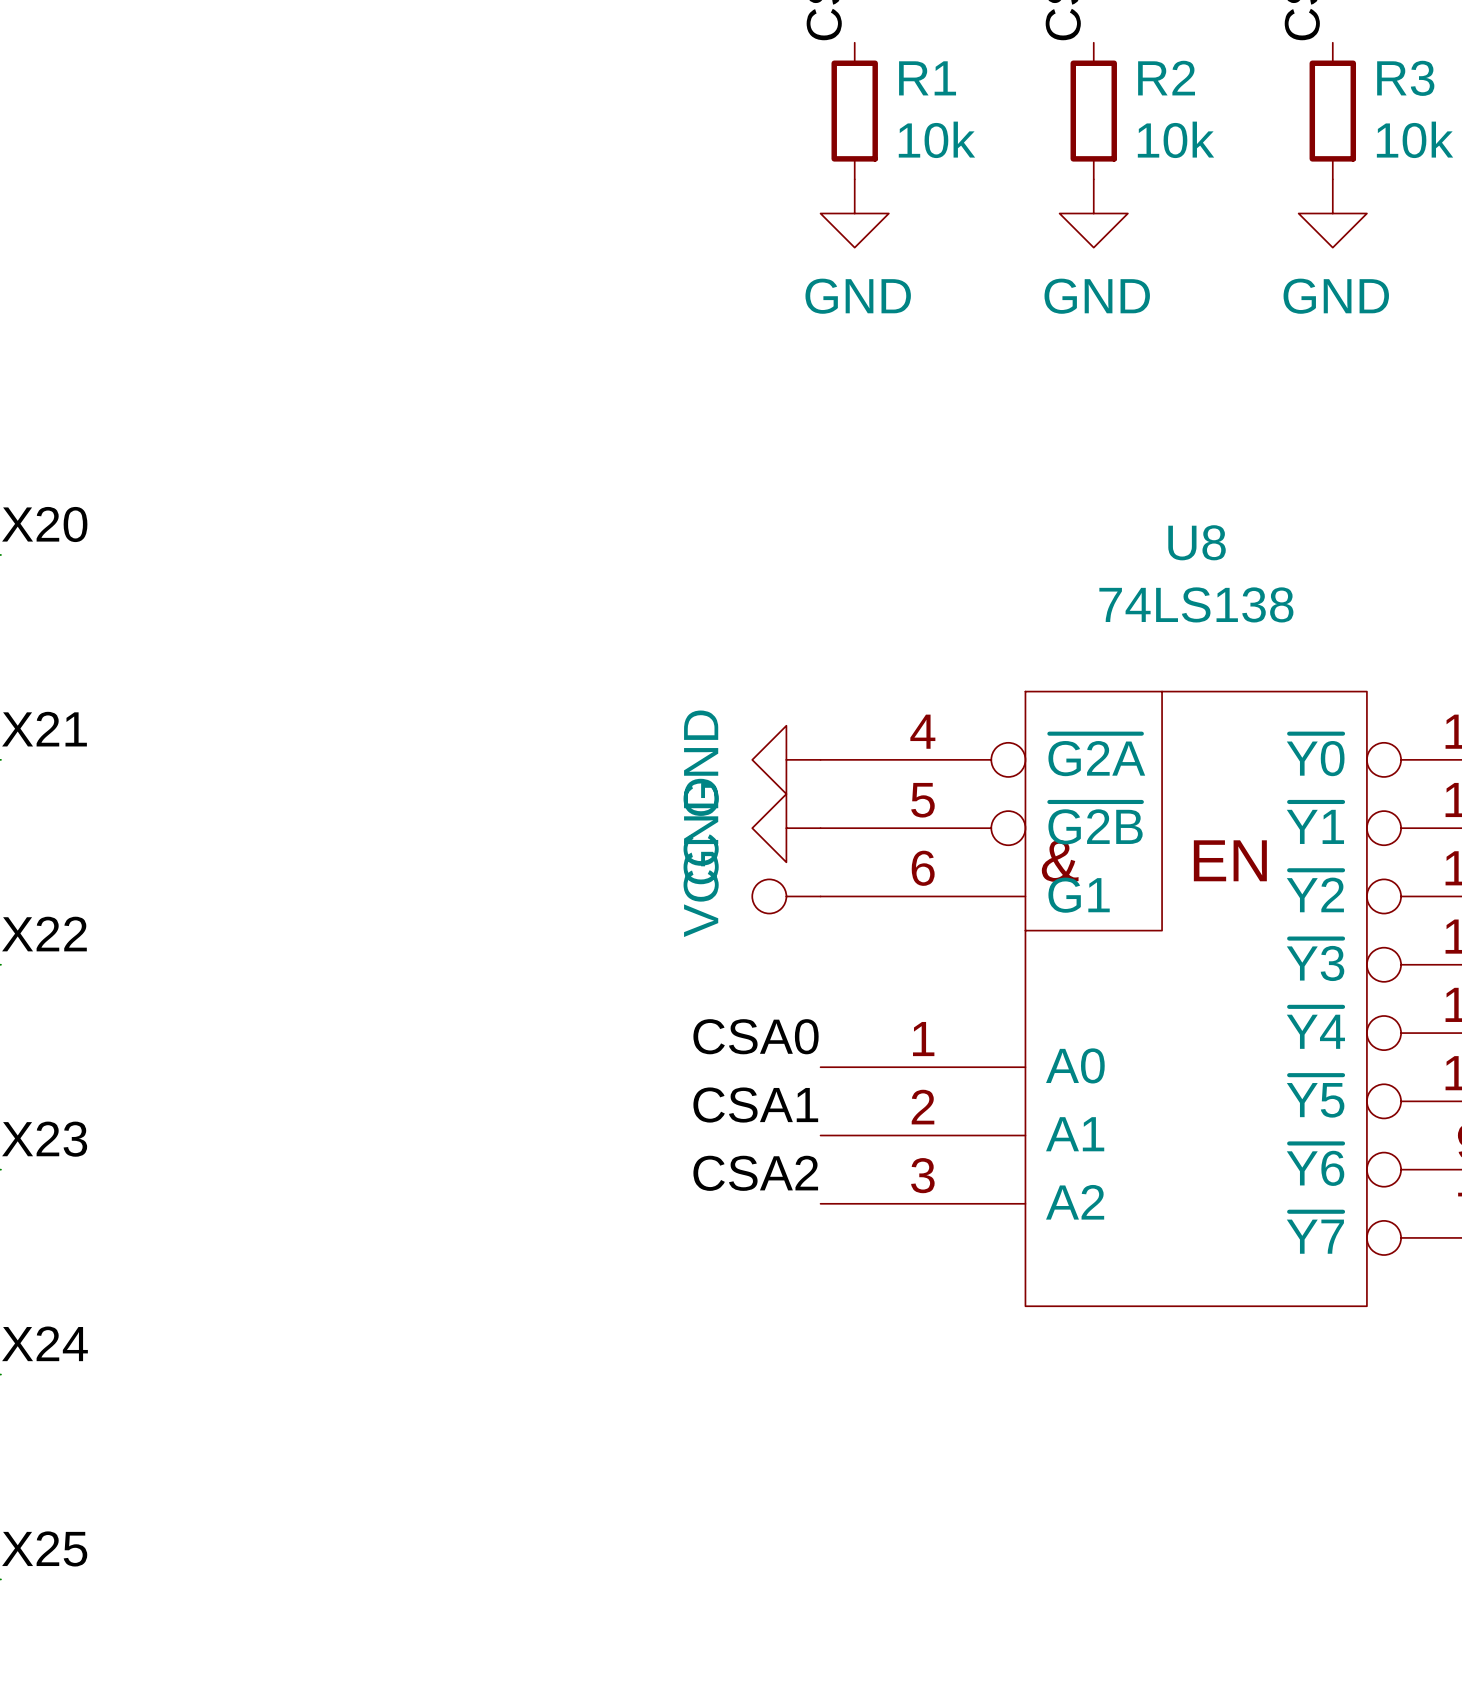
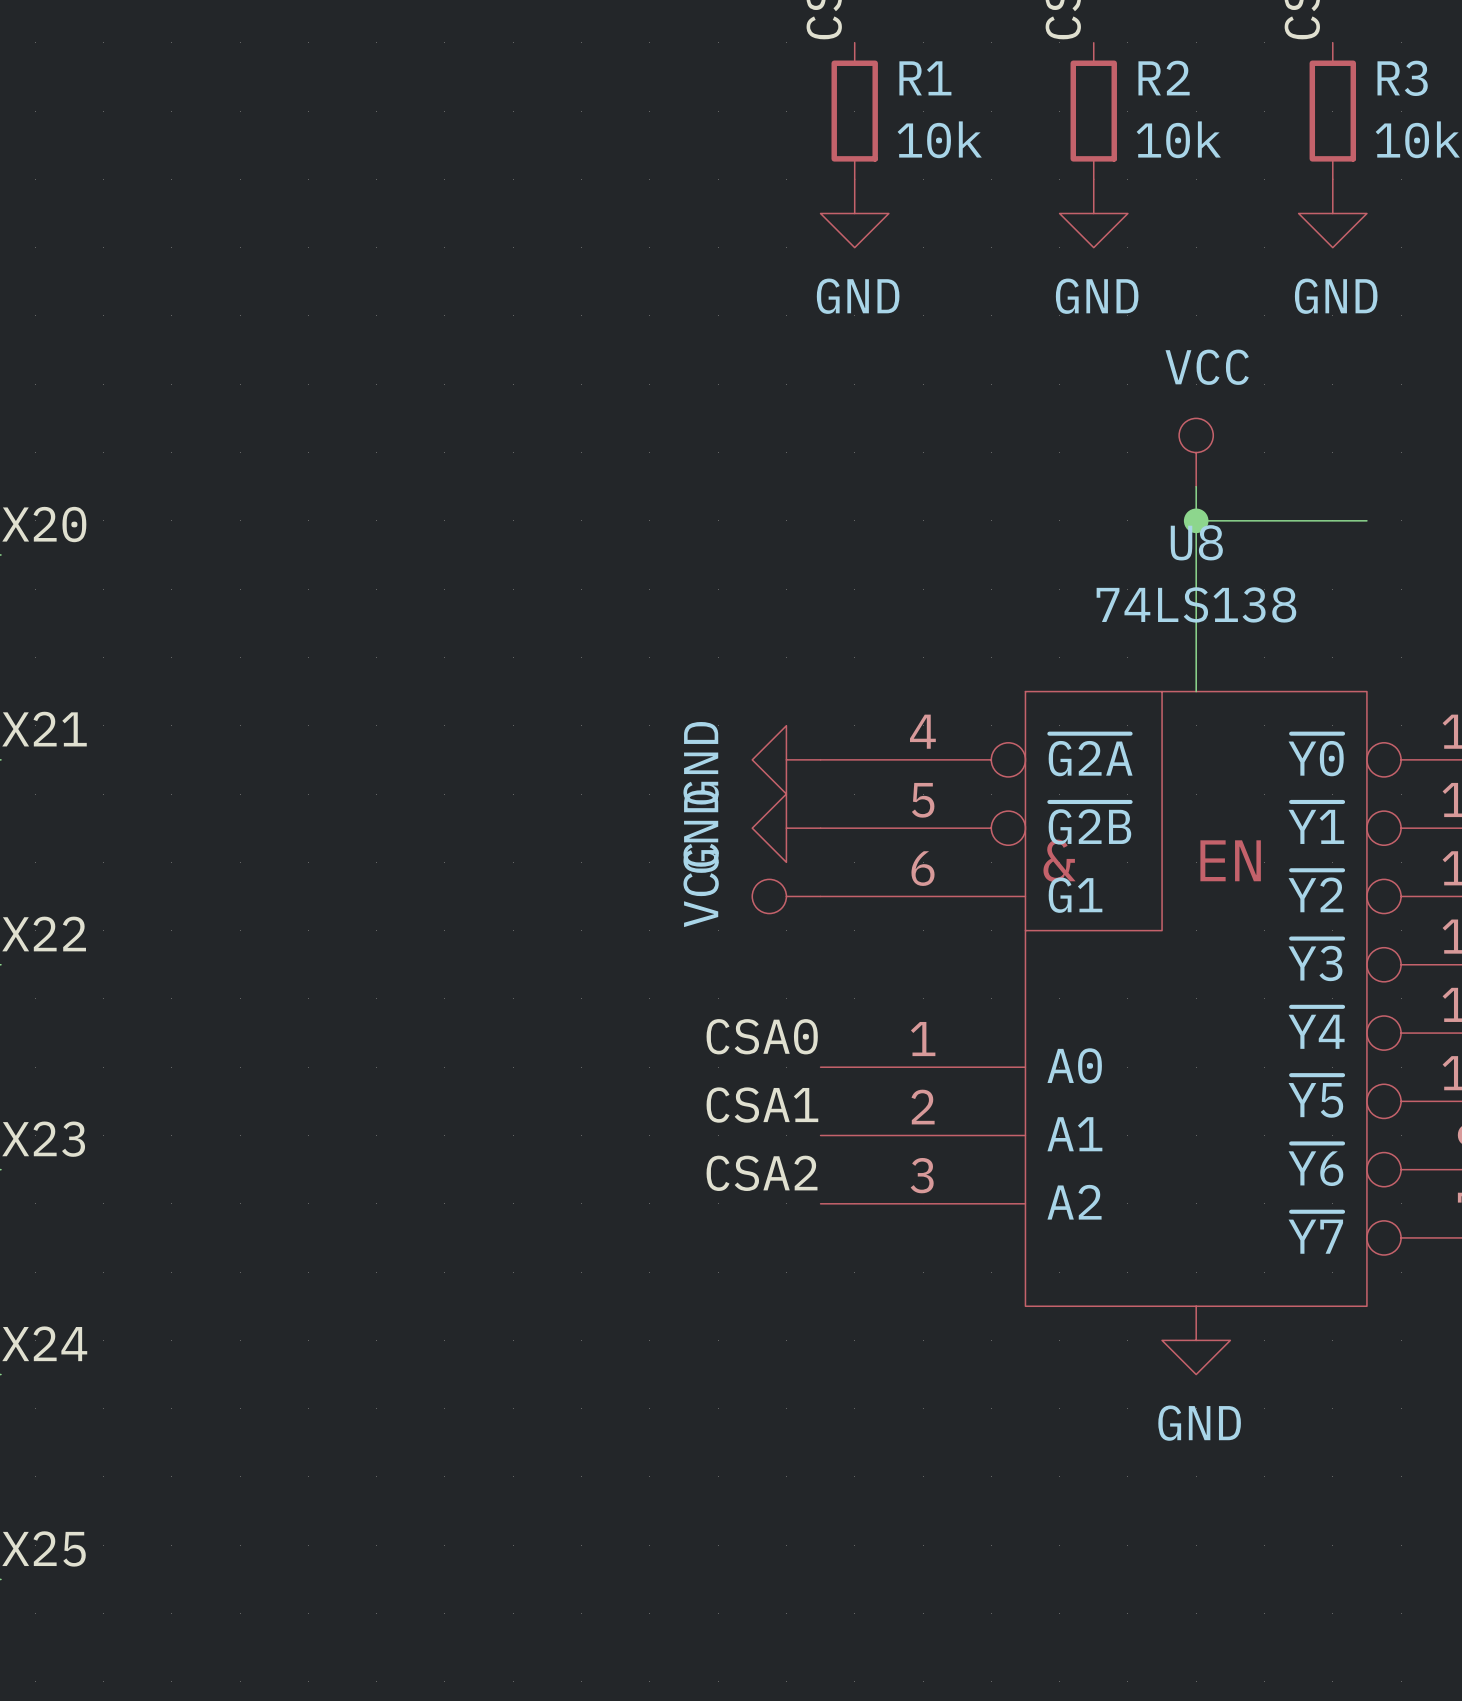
power symbol: none -> VCC (1196, 452)
wire: none -> (1196, 486) (1196, 691)
wire: none -> (1196, 520) (1366, 520)
junction: none -> (1196, 520)
power symbol: none -> GND (1196, 1340)

